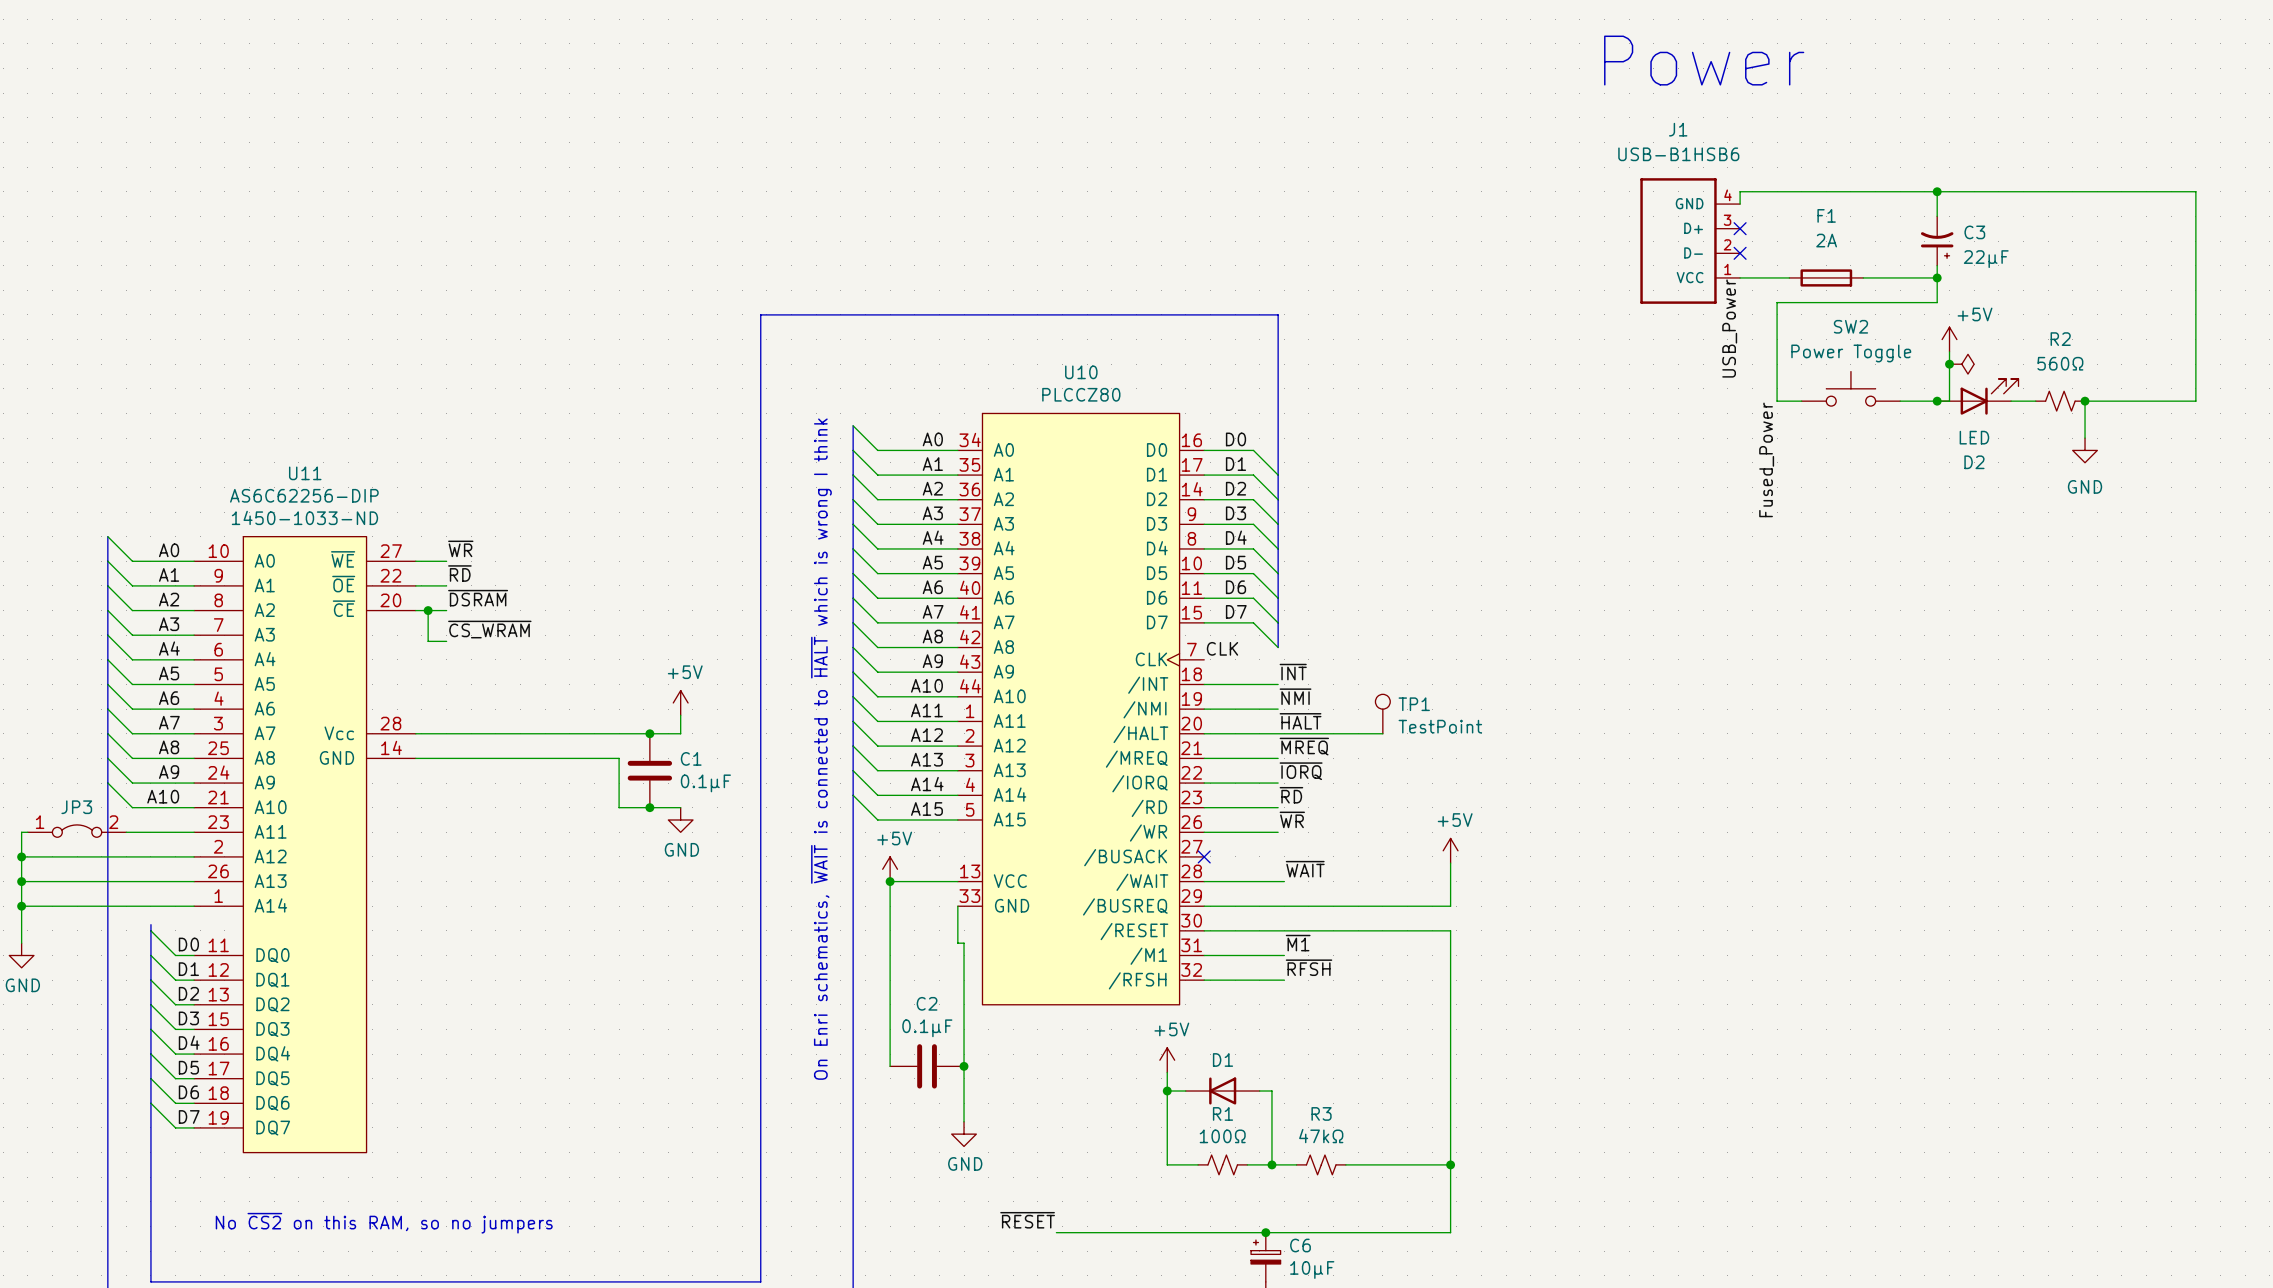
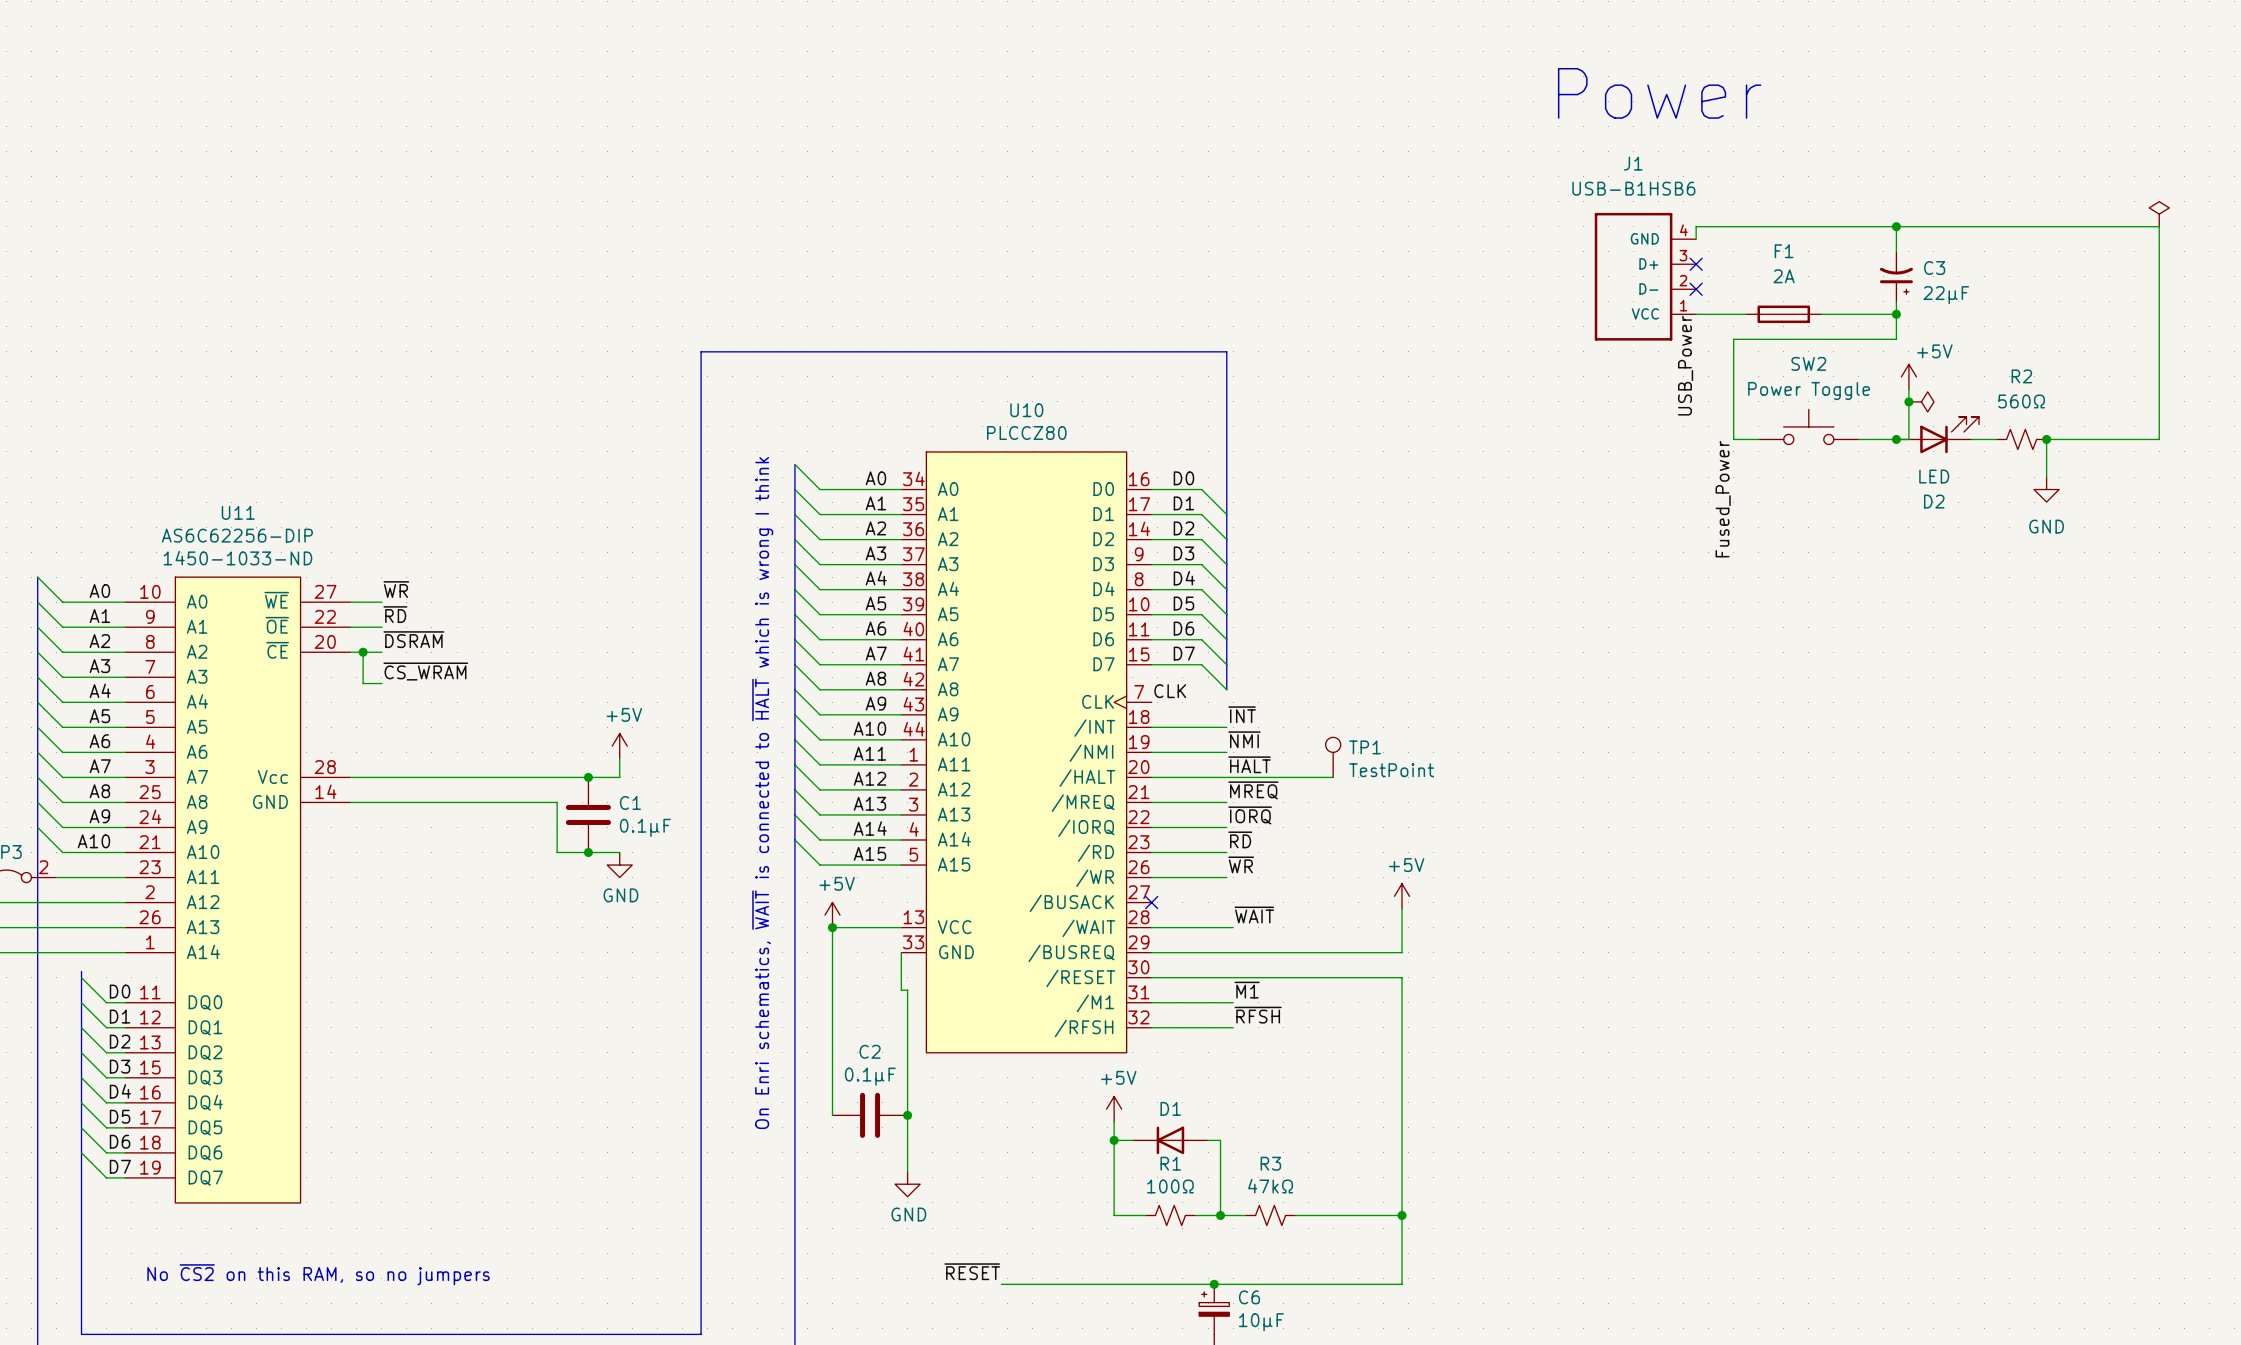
power symbol: none -> (2159, 214)

